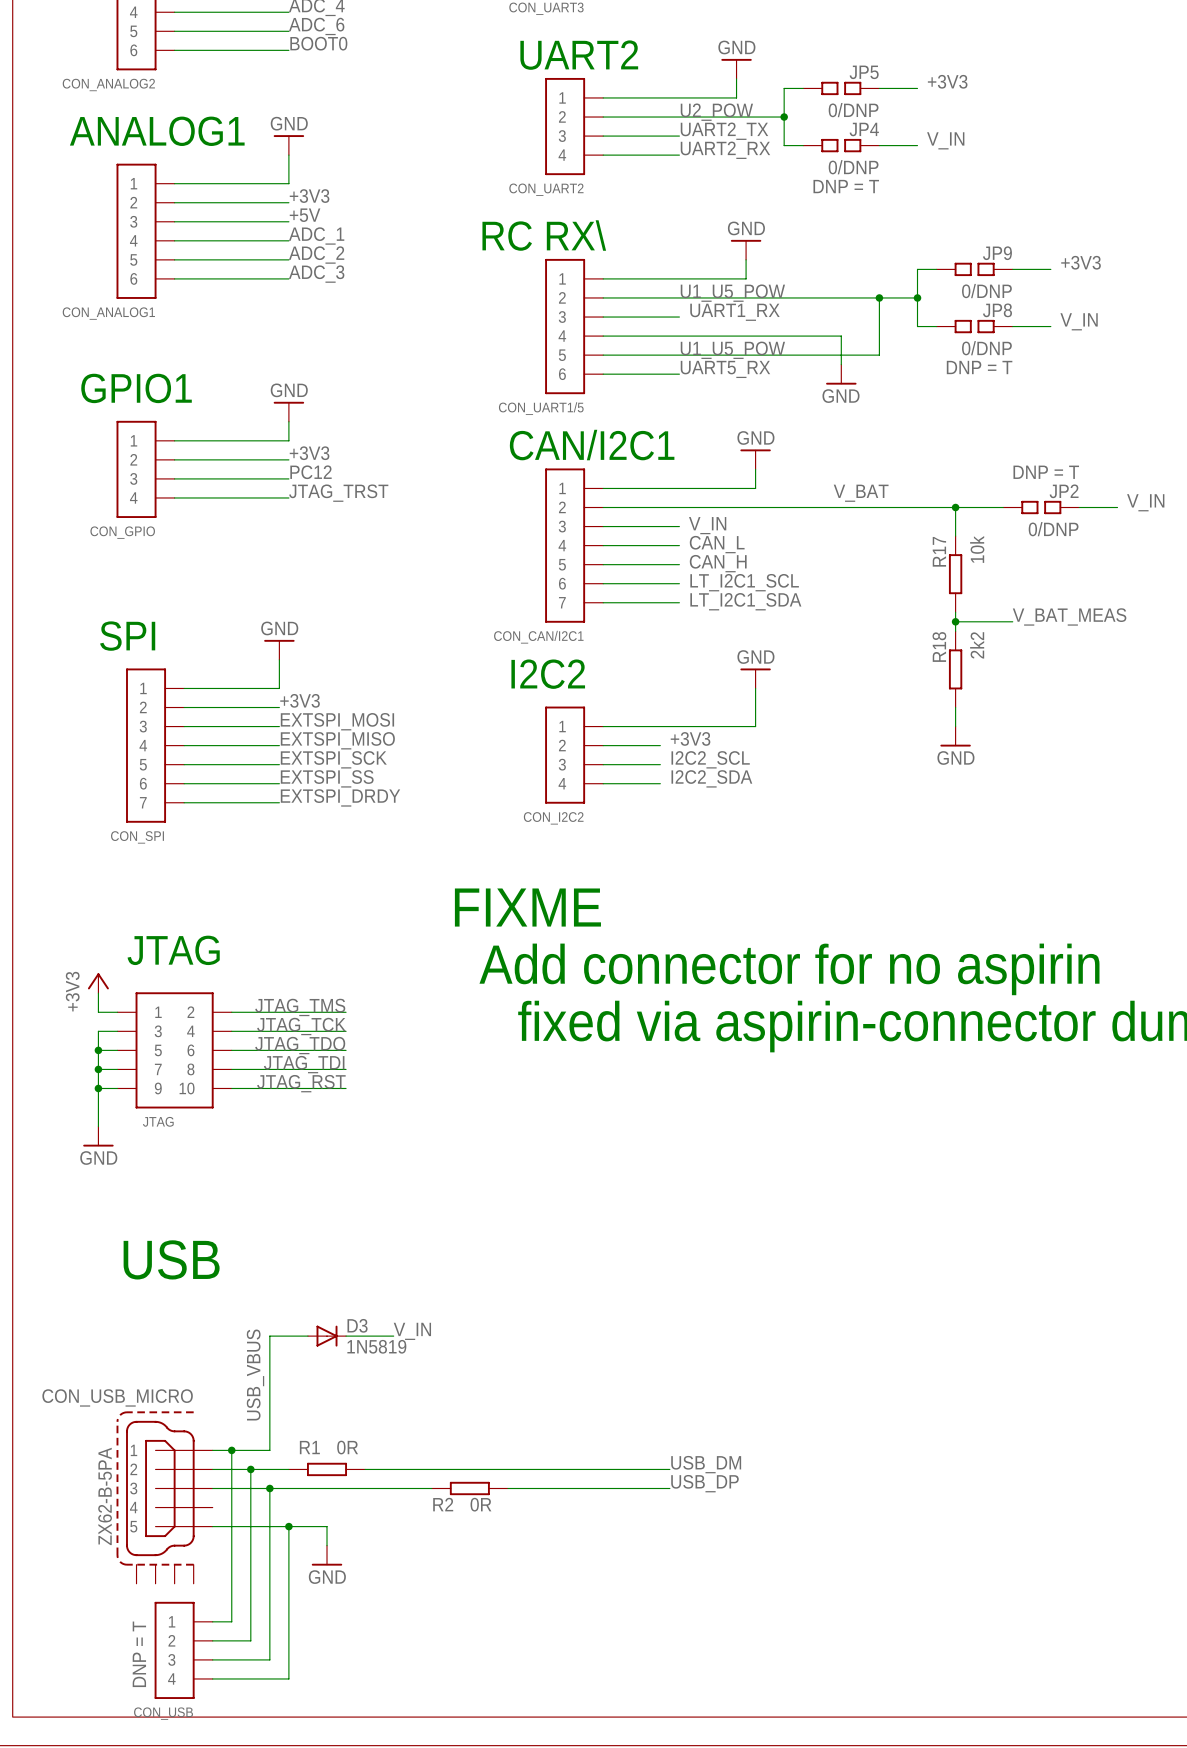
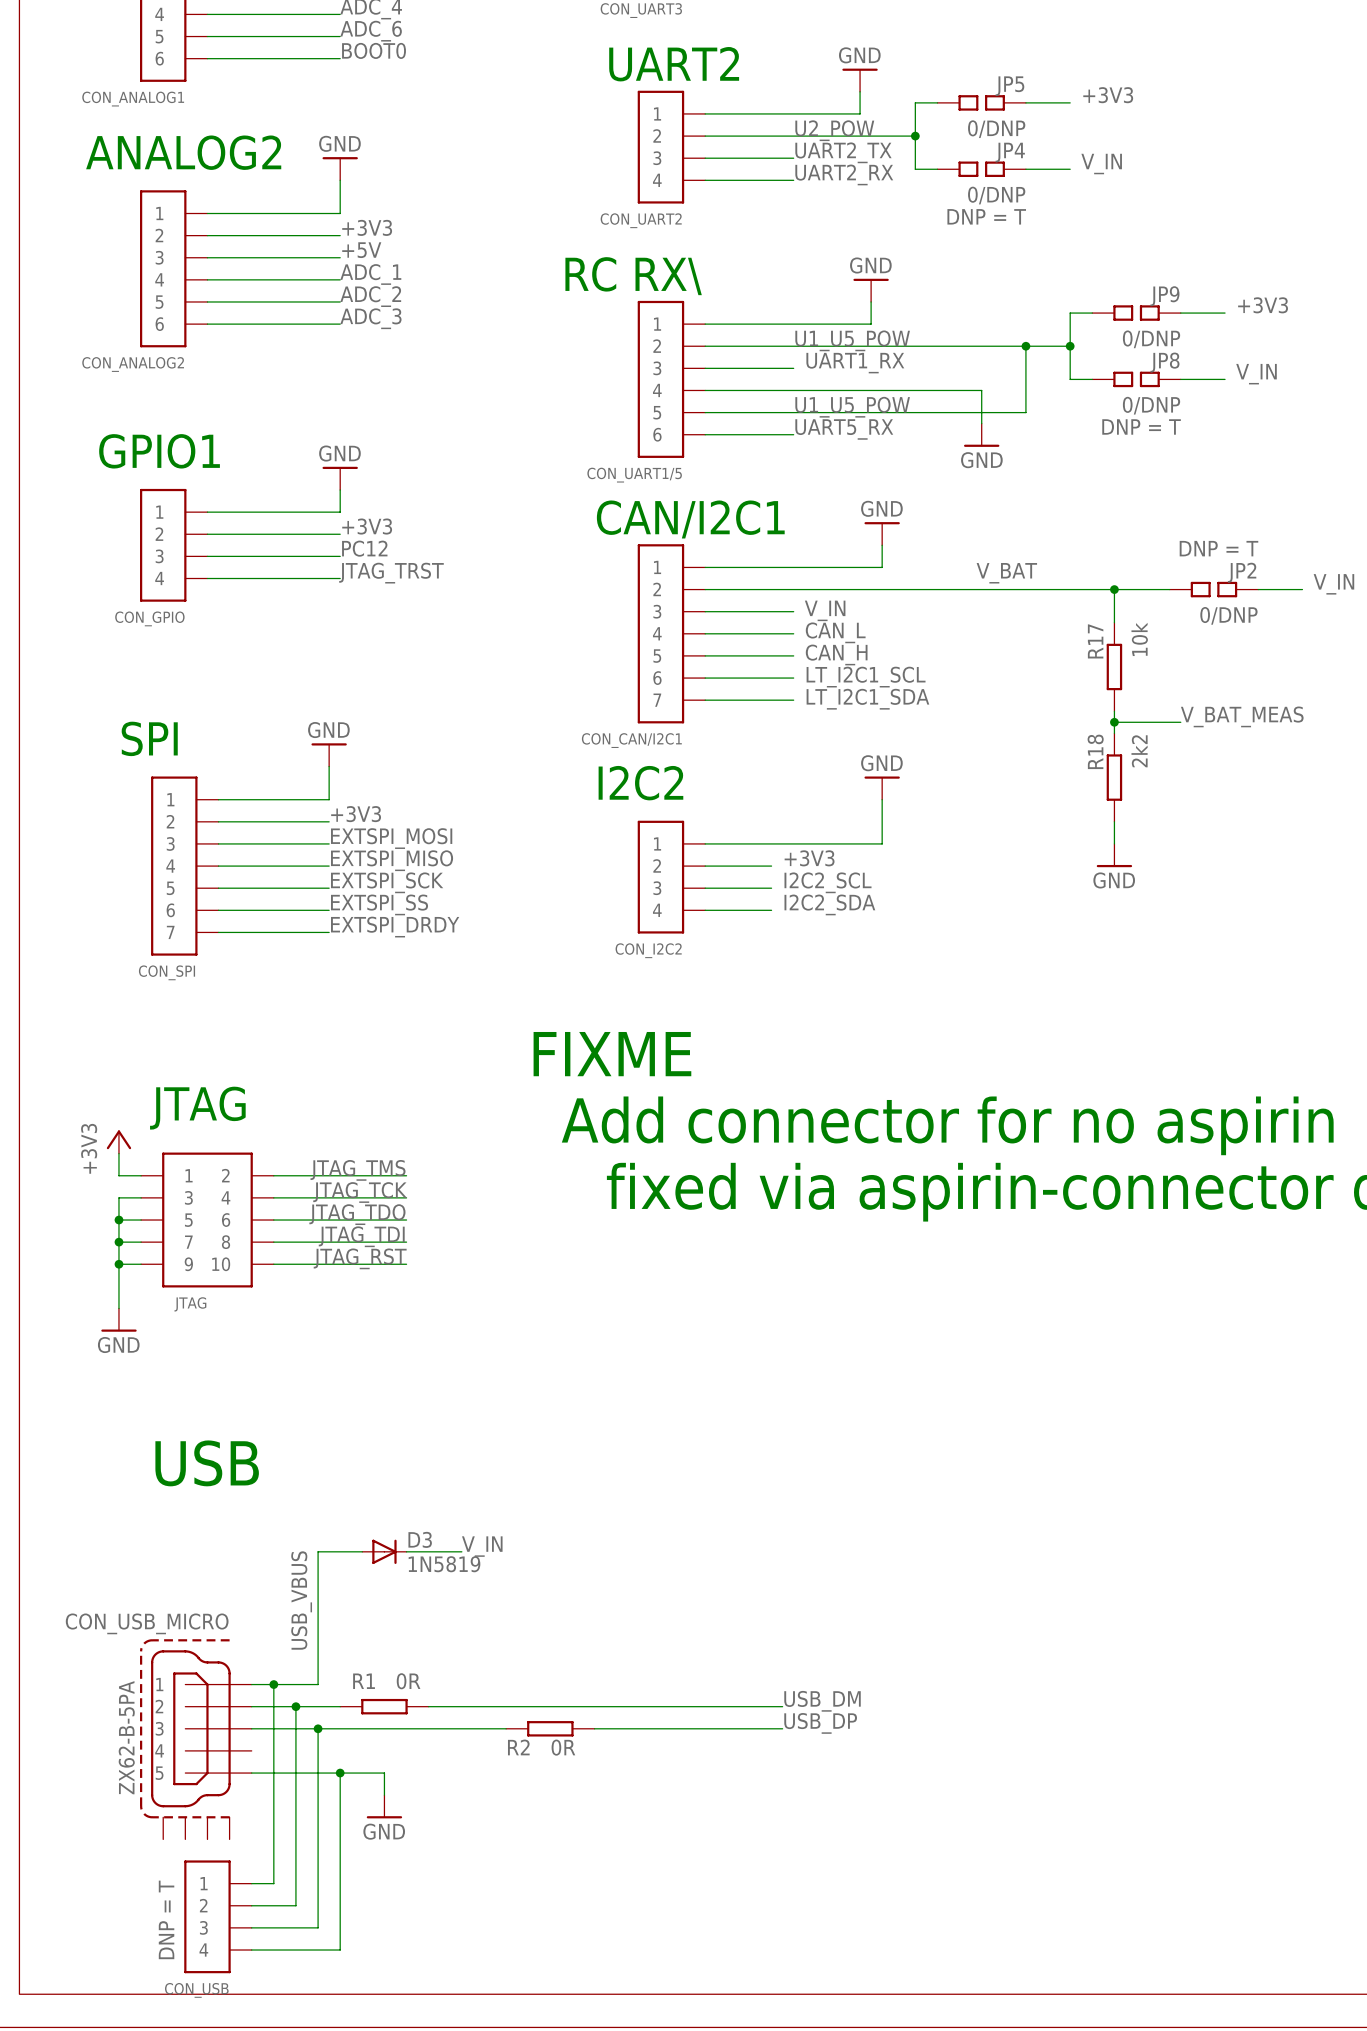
CON_ANALOG2 name: CON_ANALOG2 (108, 84) -> CON_ANALOG1 (133, 99)
text: ANALOG1 (157, 131) -> ANALOG2 (183, 152)
CON_ANALOG1 name: CON_ANALOG1 (108, 313) -> CON_ANALOG2 (133, 364)

